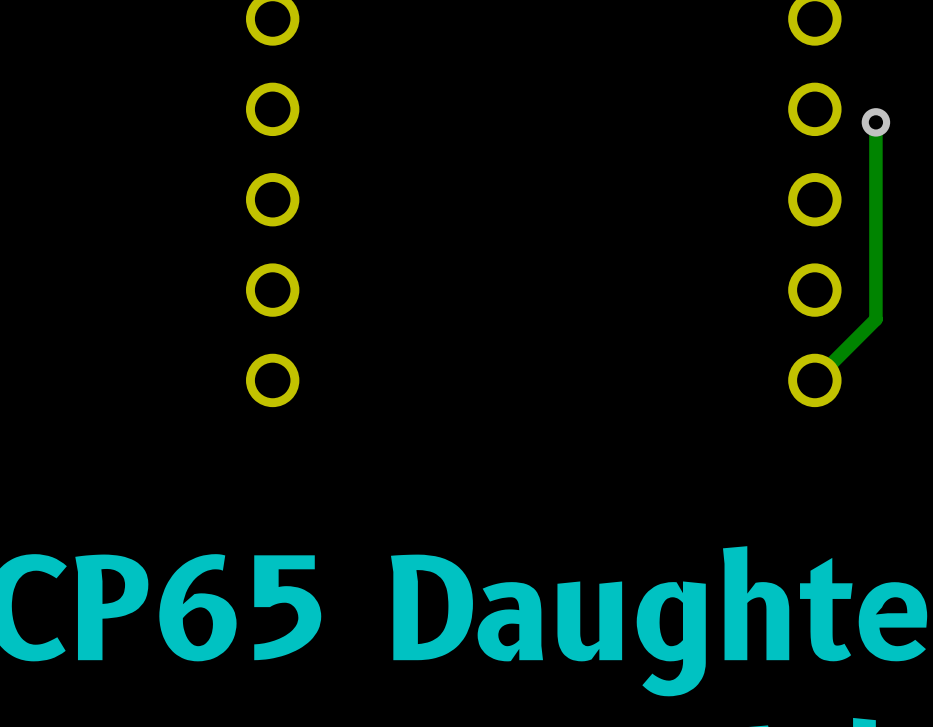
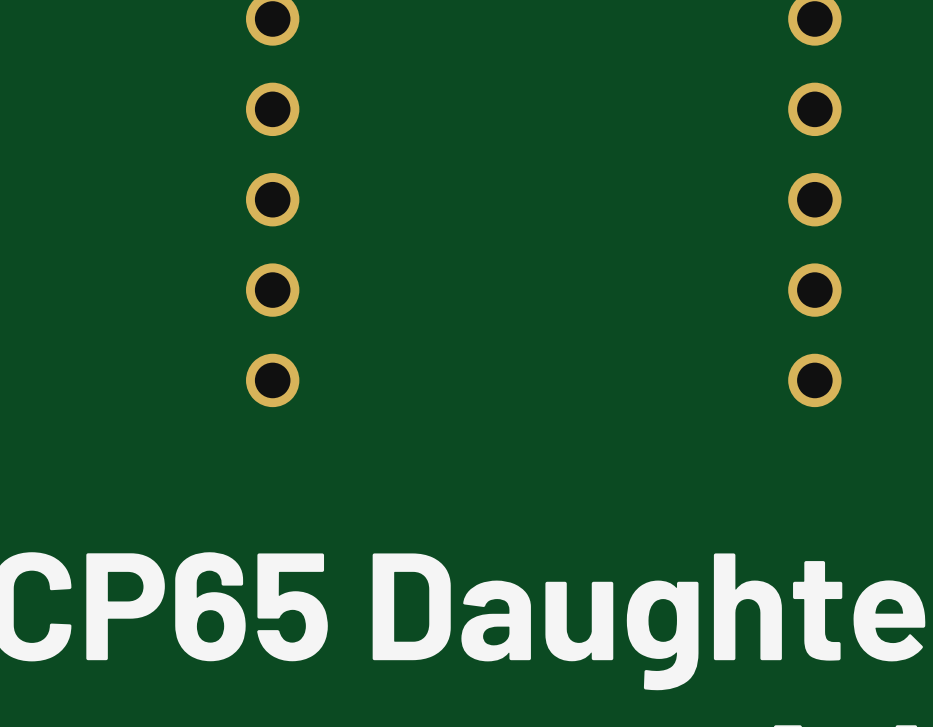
track: (875, 122) (875, 319) (814, 380) -> none
via: (875, 122) -> none

